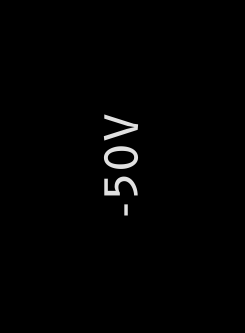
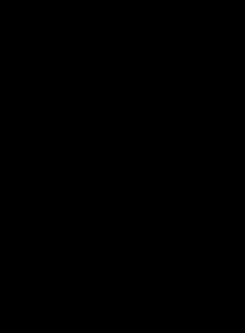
text: -50V (120, 164) -> none

